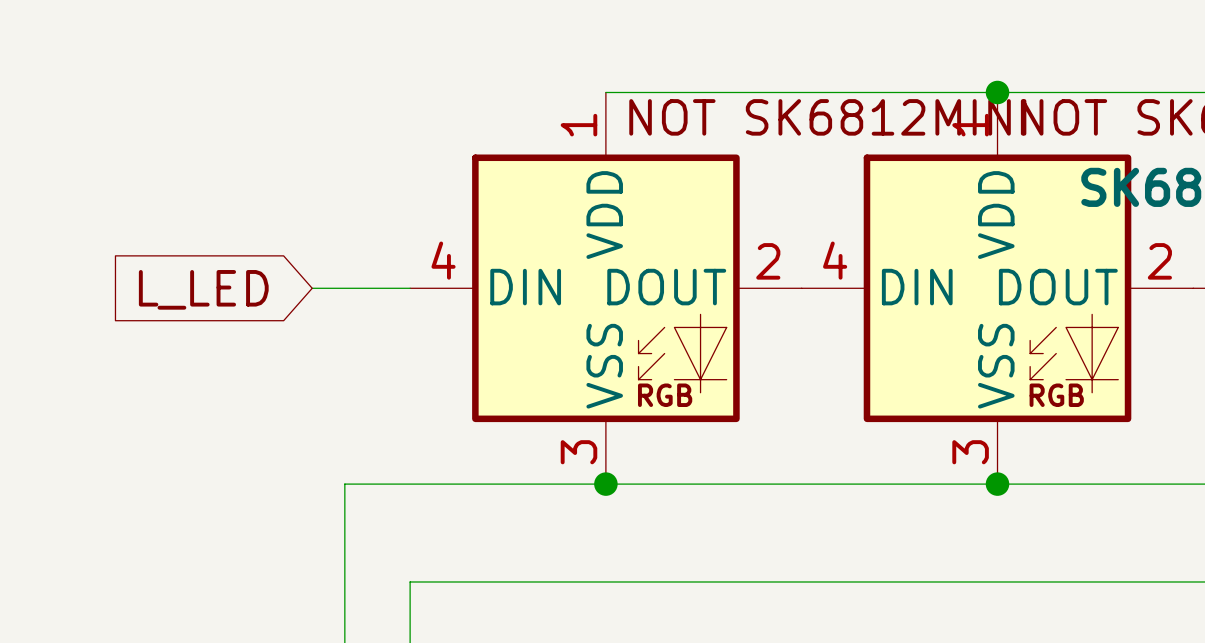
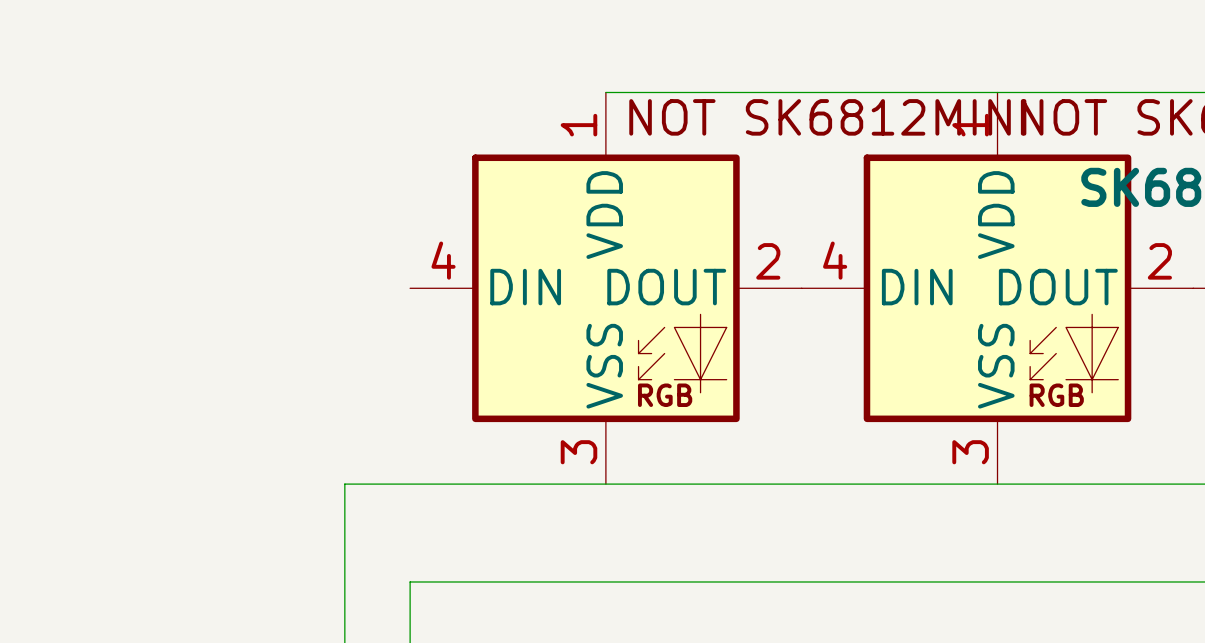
junction: (997, 92) -> none
wire: (312, 288) (410, 288) -> none
global label: L_LED (203, 289) -> none
junction: (605, 484) -> none
junction: (997, 484) -> none

